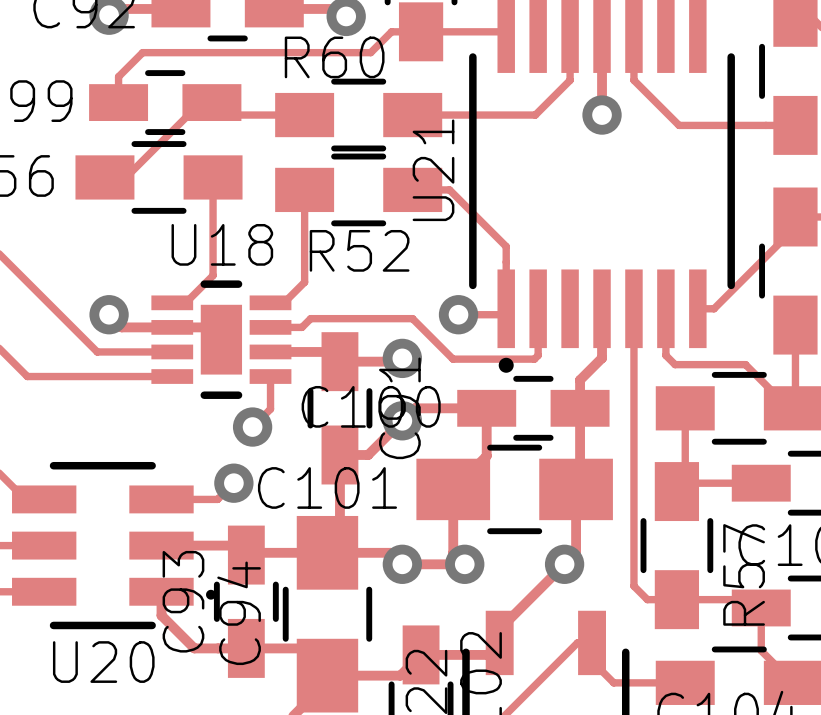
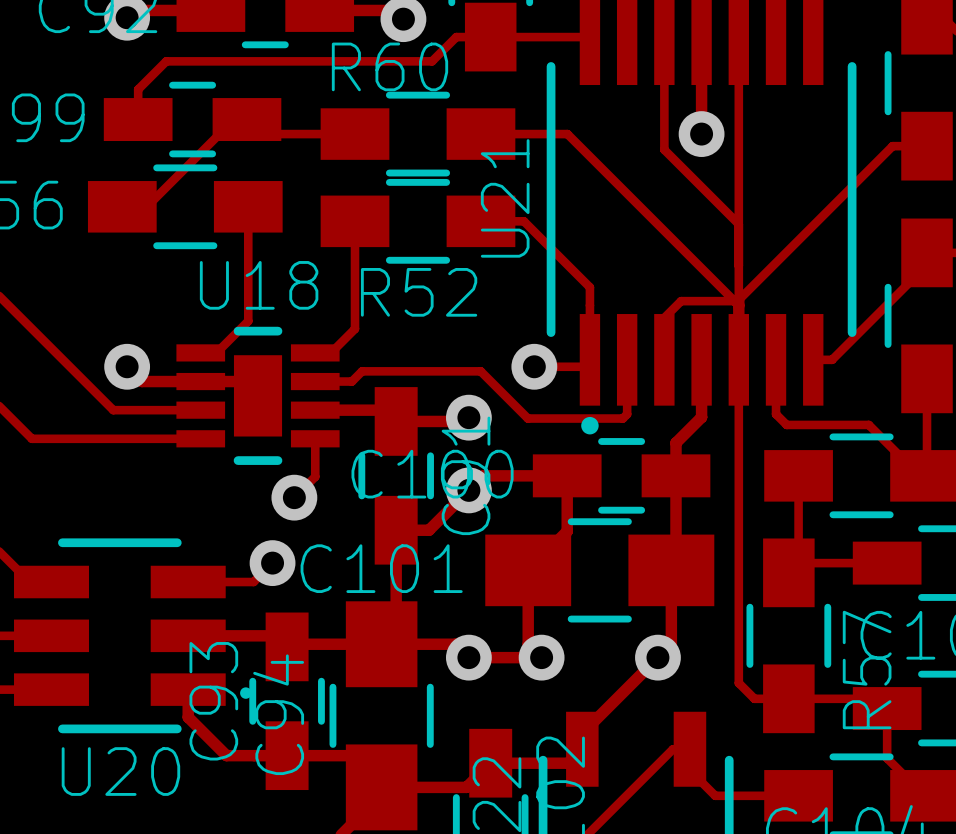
track: (570, 80) (535, 115) (486, 115) -> (664, 93) (664, 149) (738, 224)
track: (633, 80) (679, 125) (765, 125) -> (738, 93) (738, 359) (738, 300) (892, 146)
track: none -> (567, 134) (738, 305)
track: none -> (734, 301) (681, 301) (664, 317) (664, 359)

